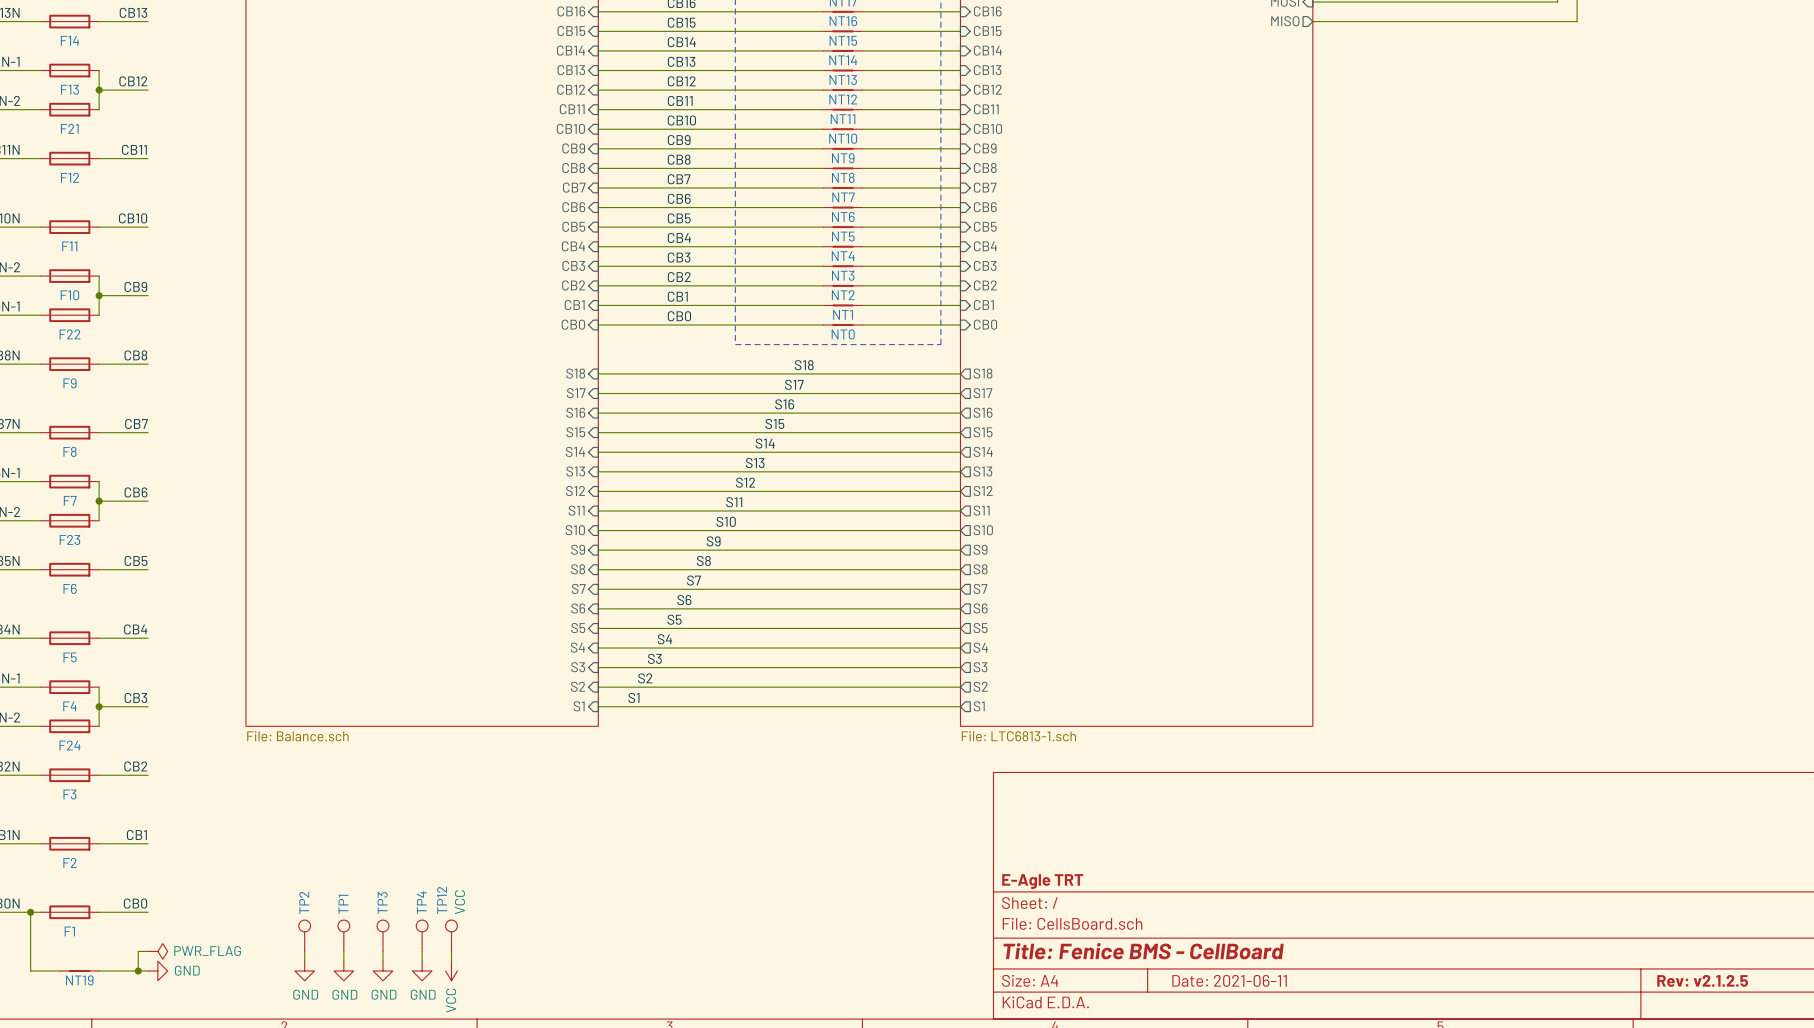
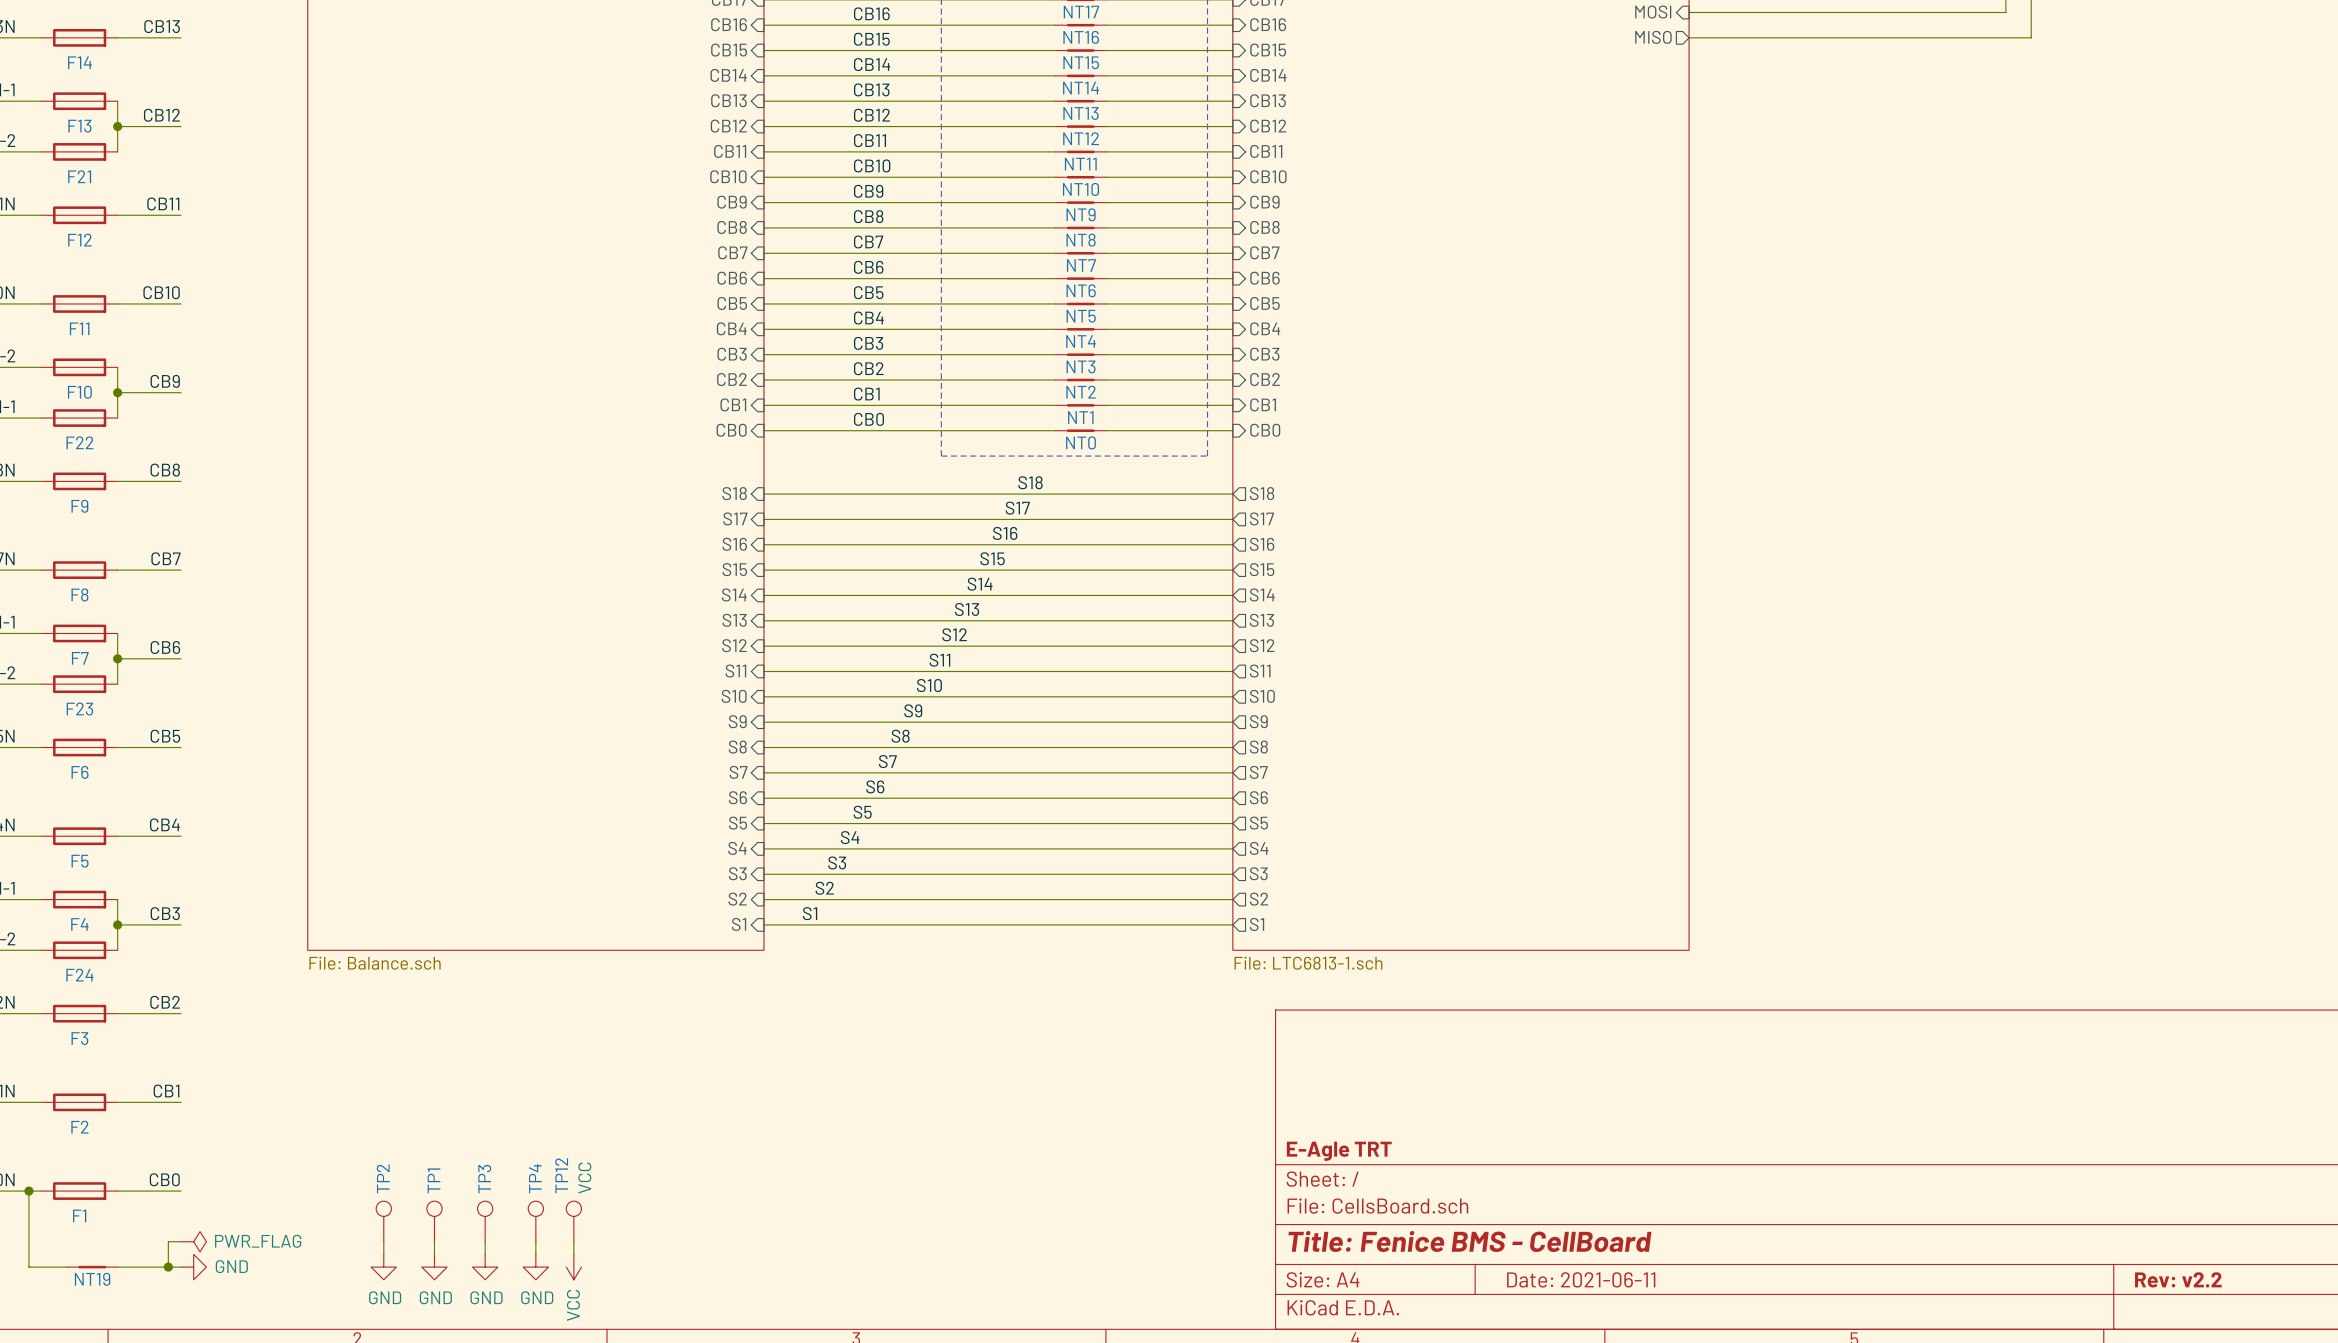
title block: Rev: v2.1.2.5 (1702, 980) -> Rev: v2.2 (2178, 1279)

